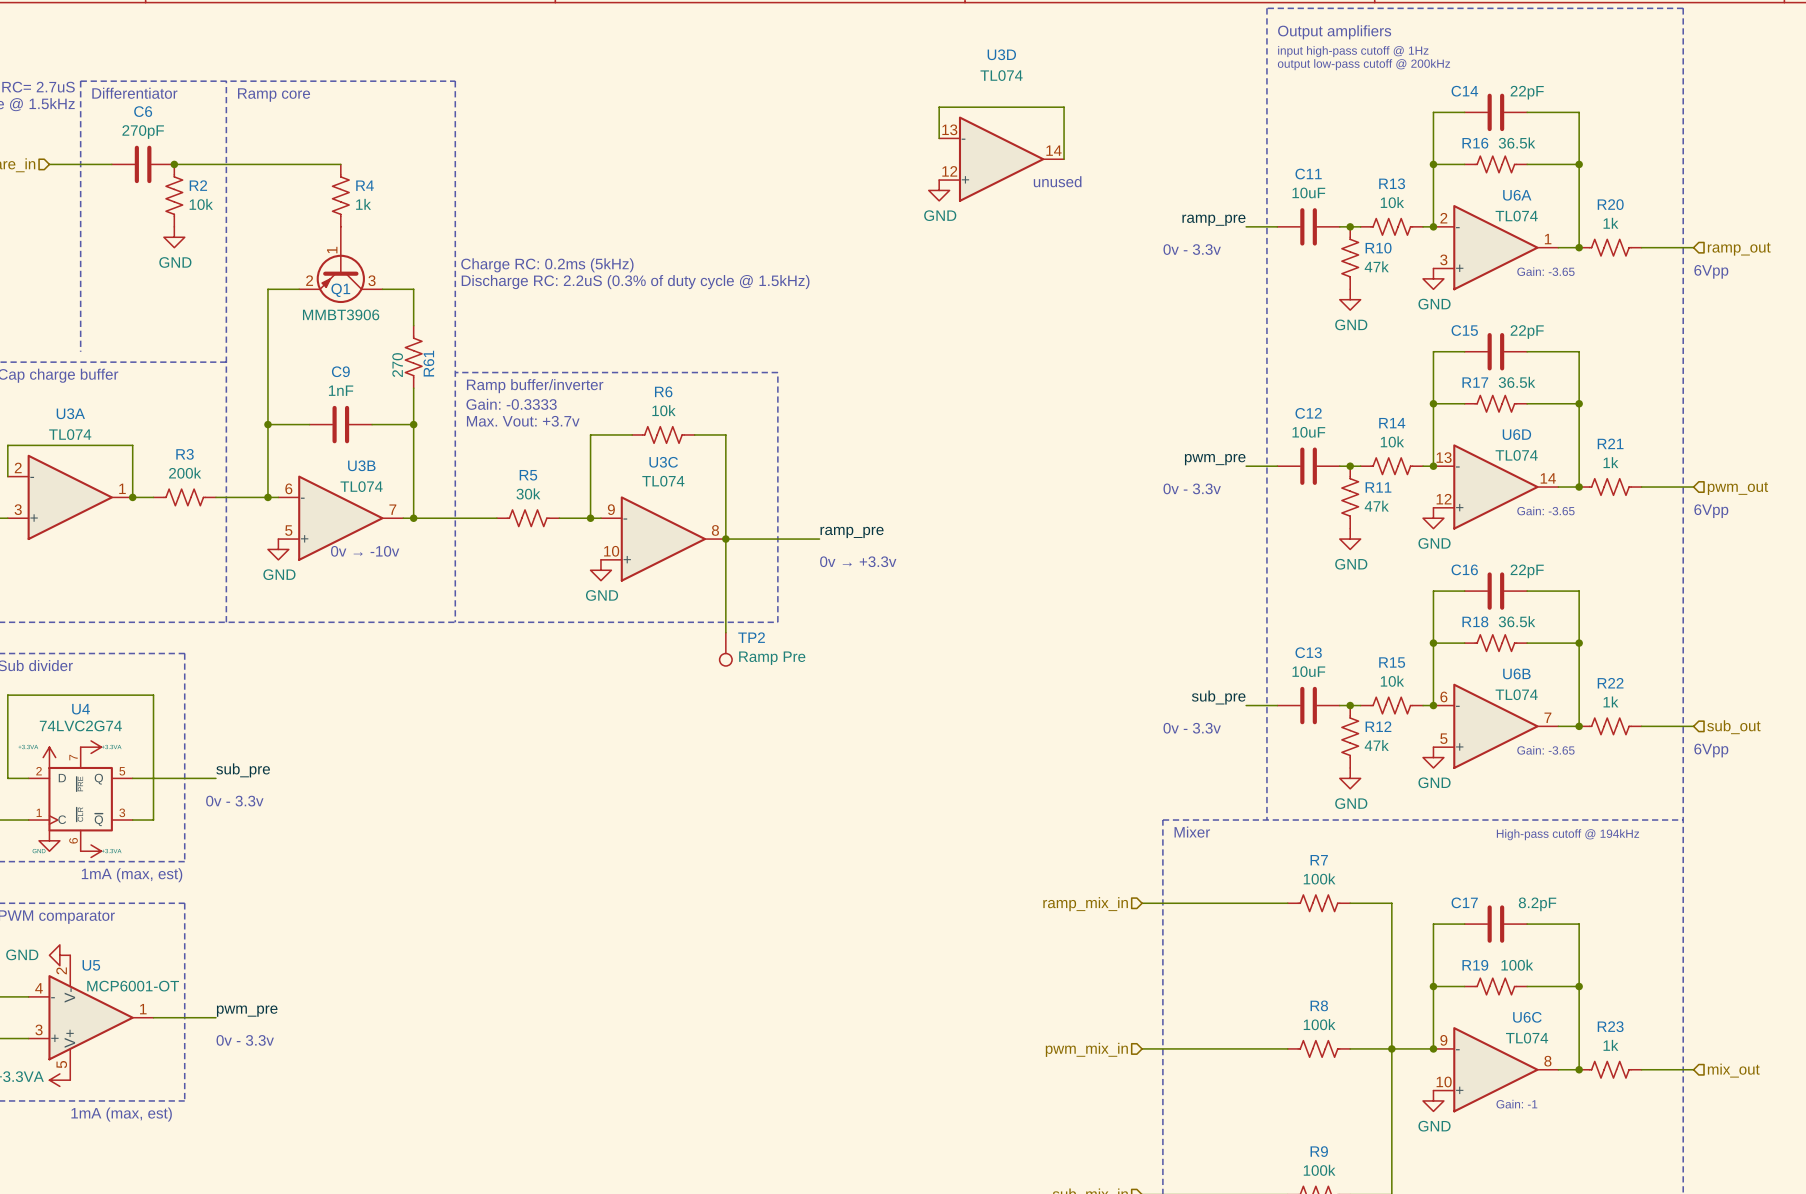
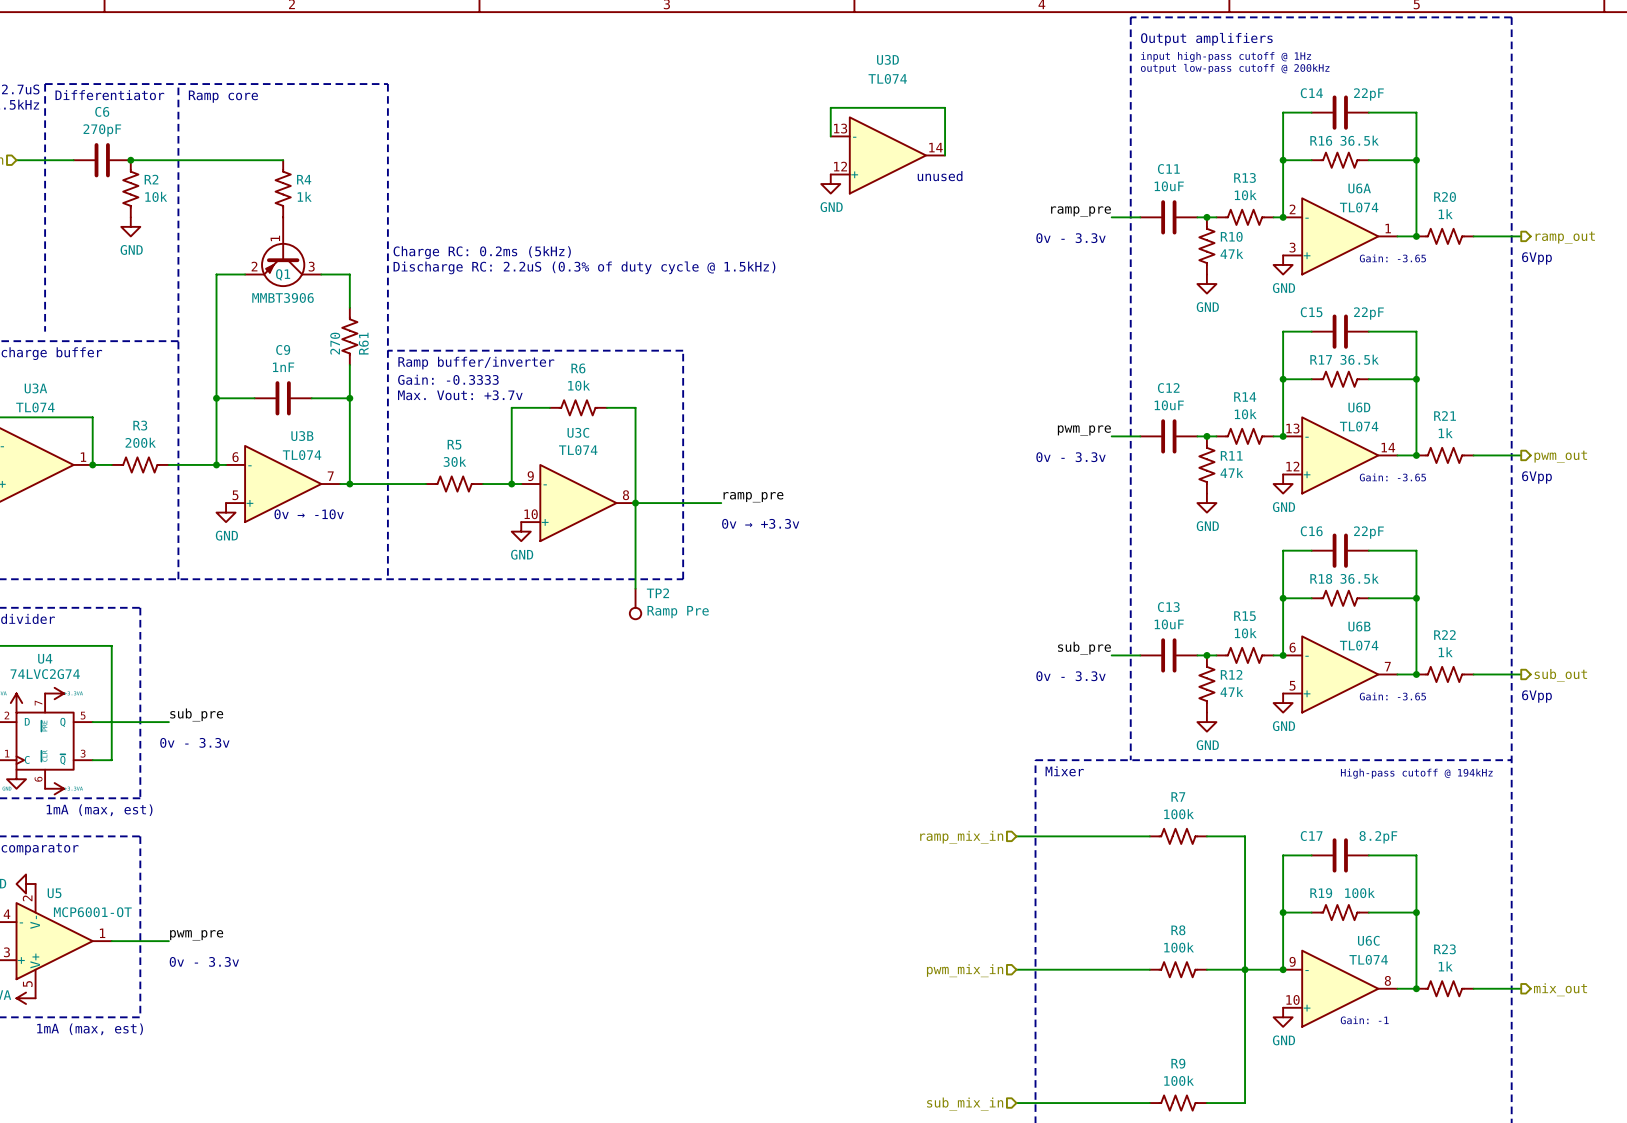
hierarchical label shape: input (1739, 249) -> output (1565, 237)
hierarchical label shape: input (1737, 488) -> output (1560, 456)
hierarchical label shape: input (1733, 727) -> output (1560, 675)
hierarchical label shape: input (1733, 1070) -> output (1560, 989)

